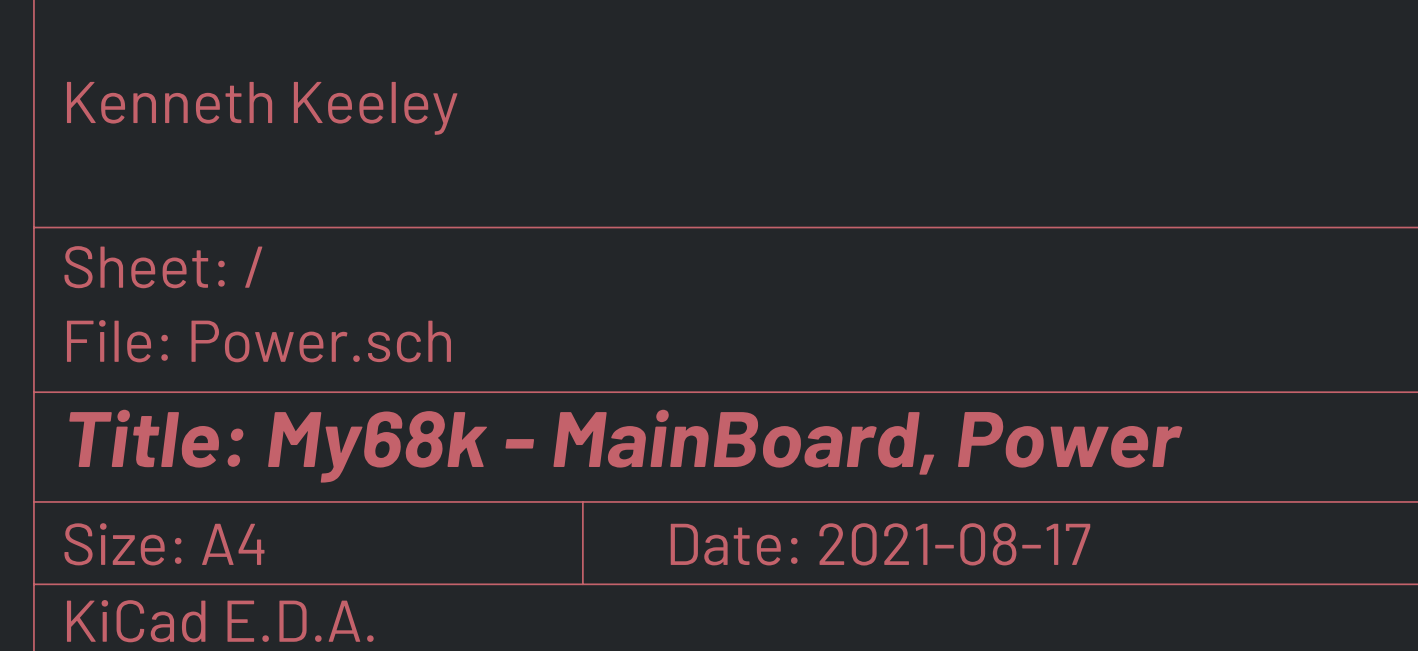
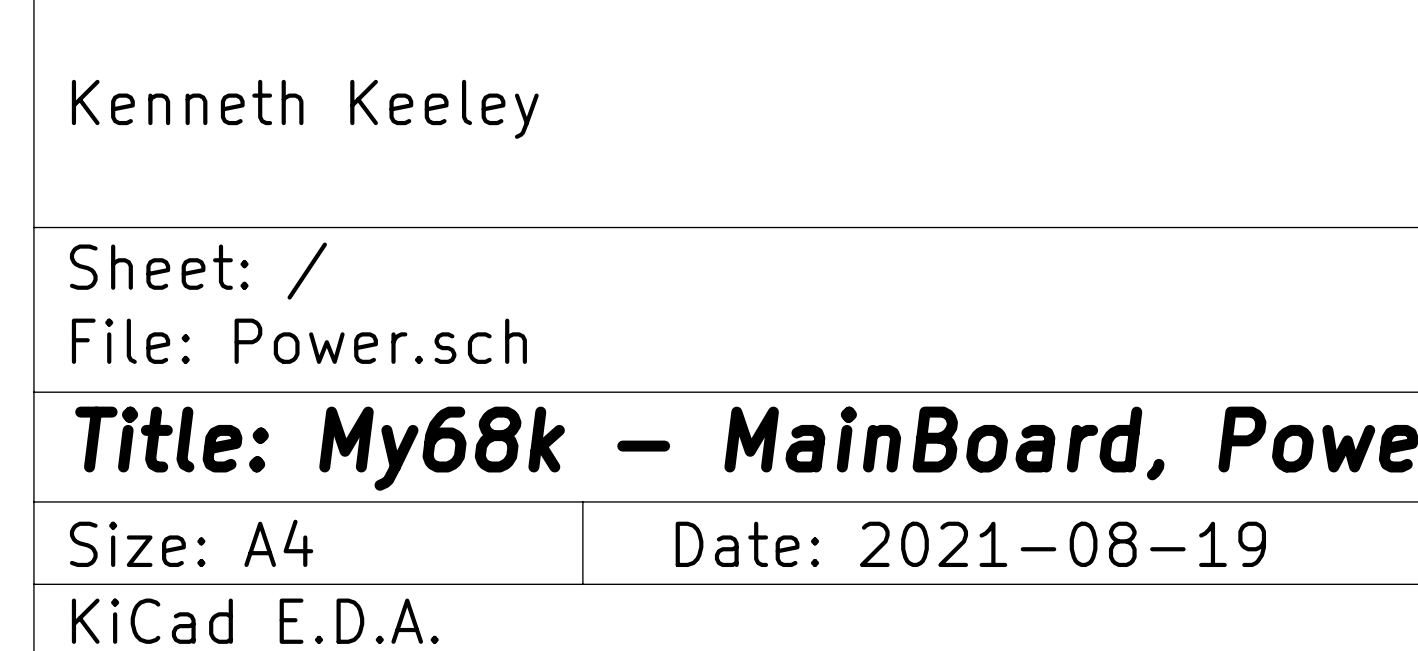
title block: Date: 2021-08-17 (880, 544) -> Date: 2021-08-19 (970, 544)

